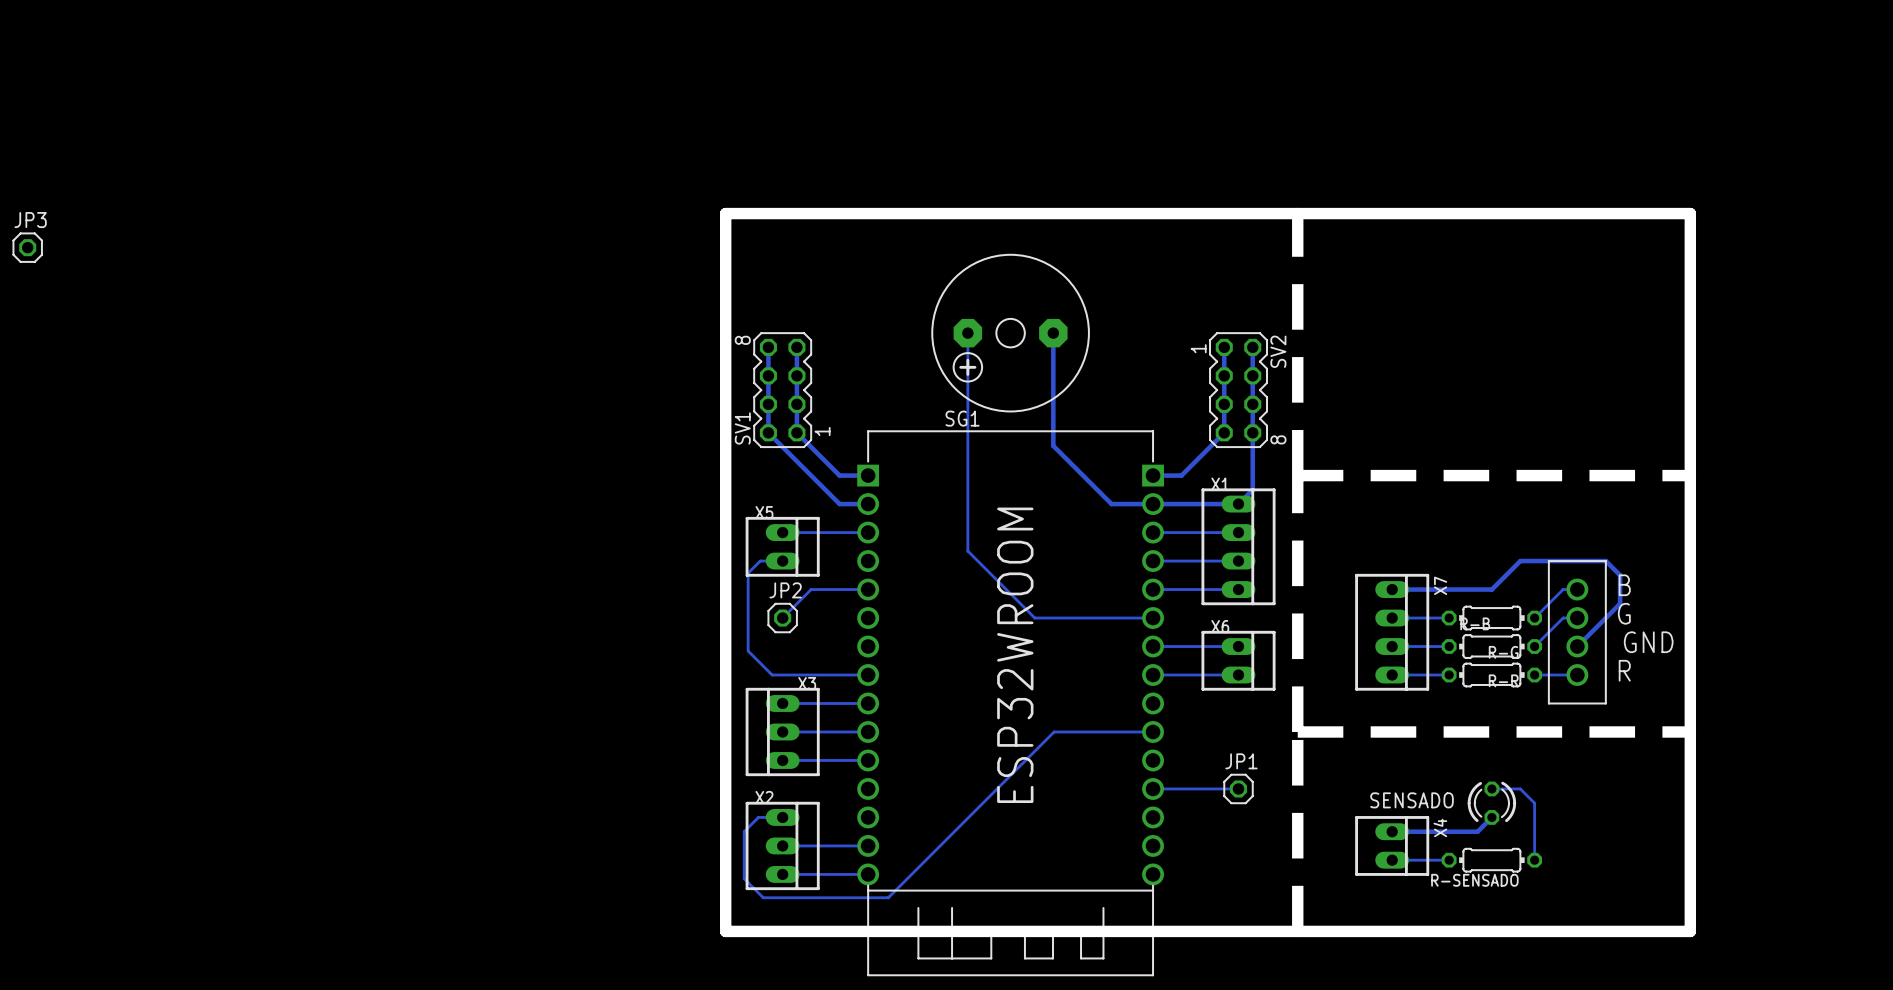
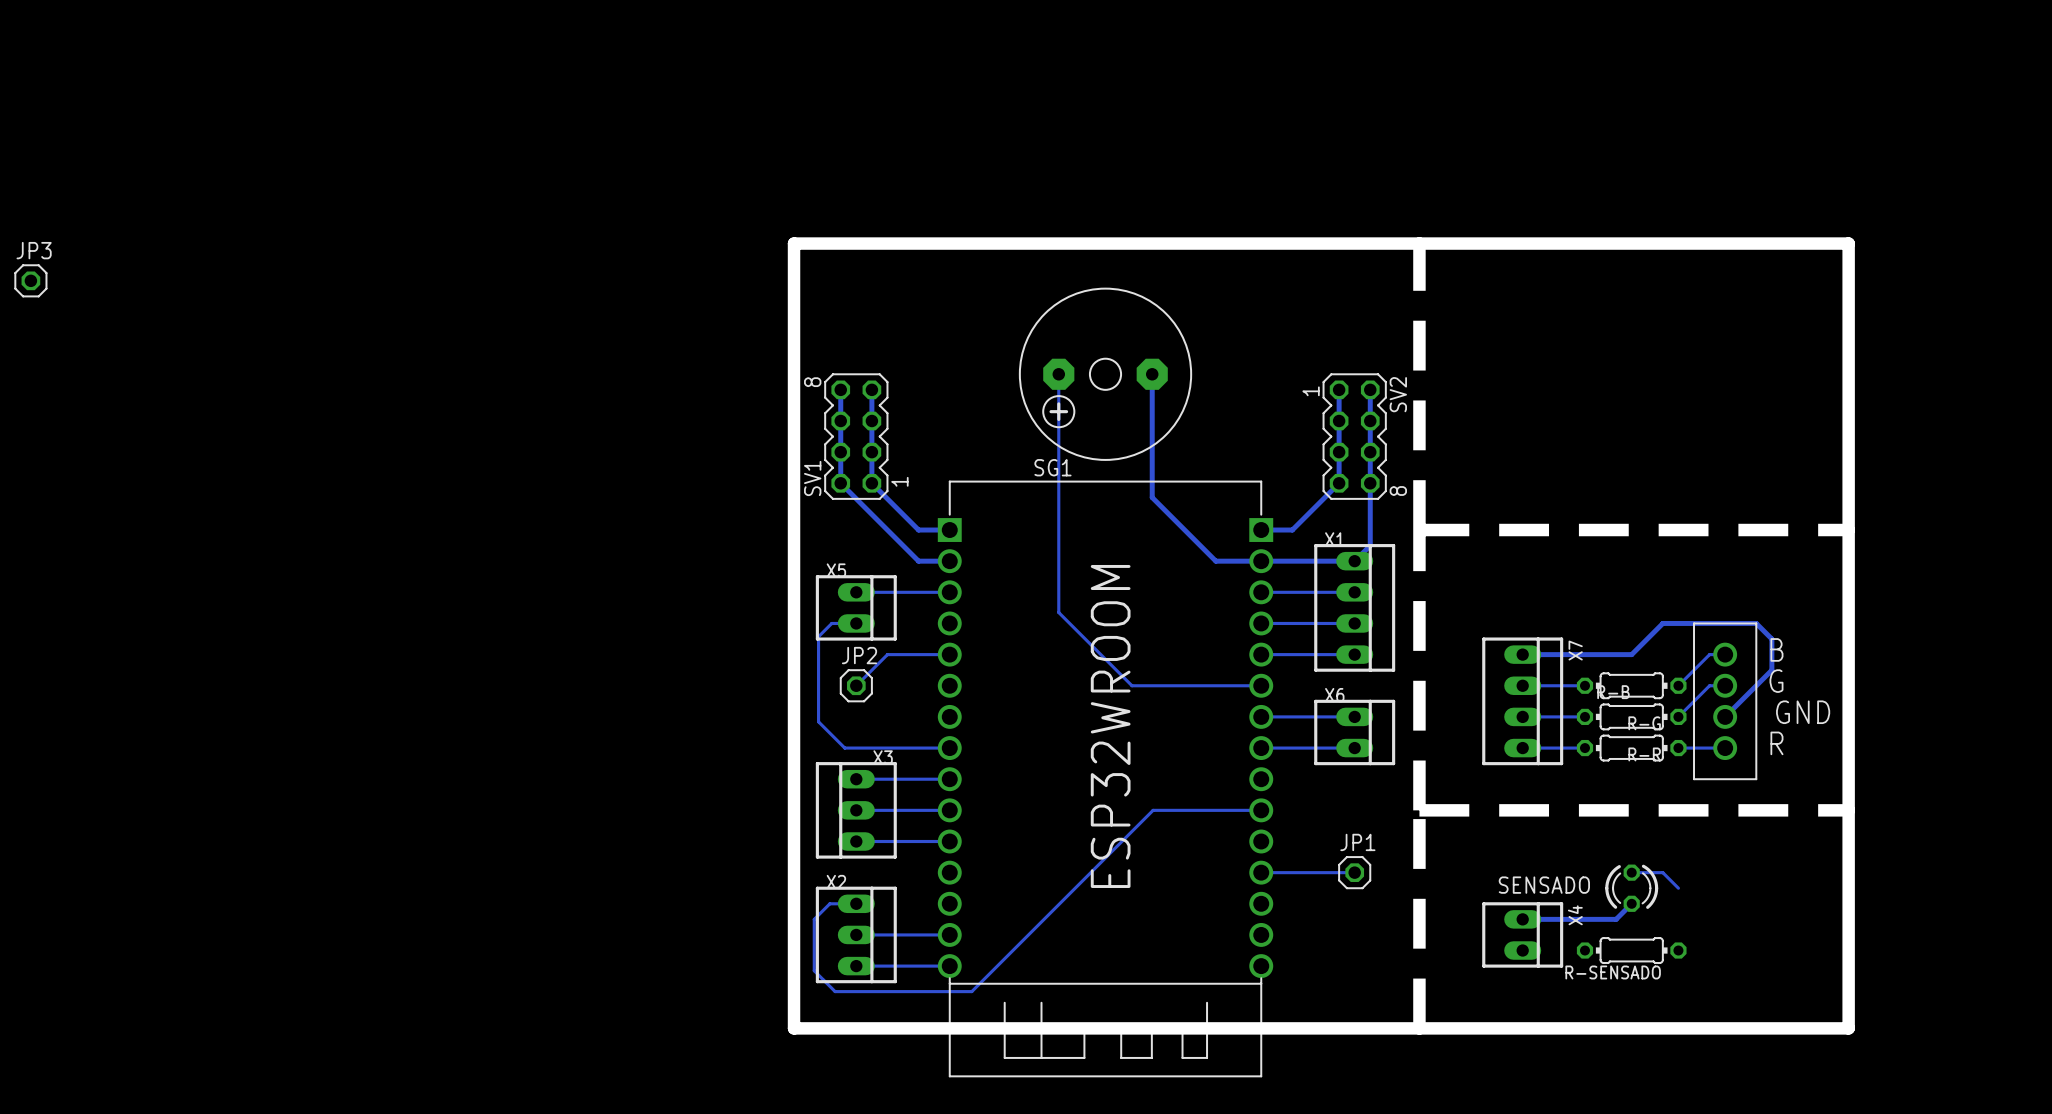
bottom track: (1534, 803) (1534, 860) -> none
bottom track: (1392, 860) (1449, 860) -> none

